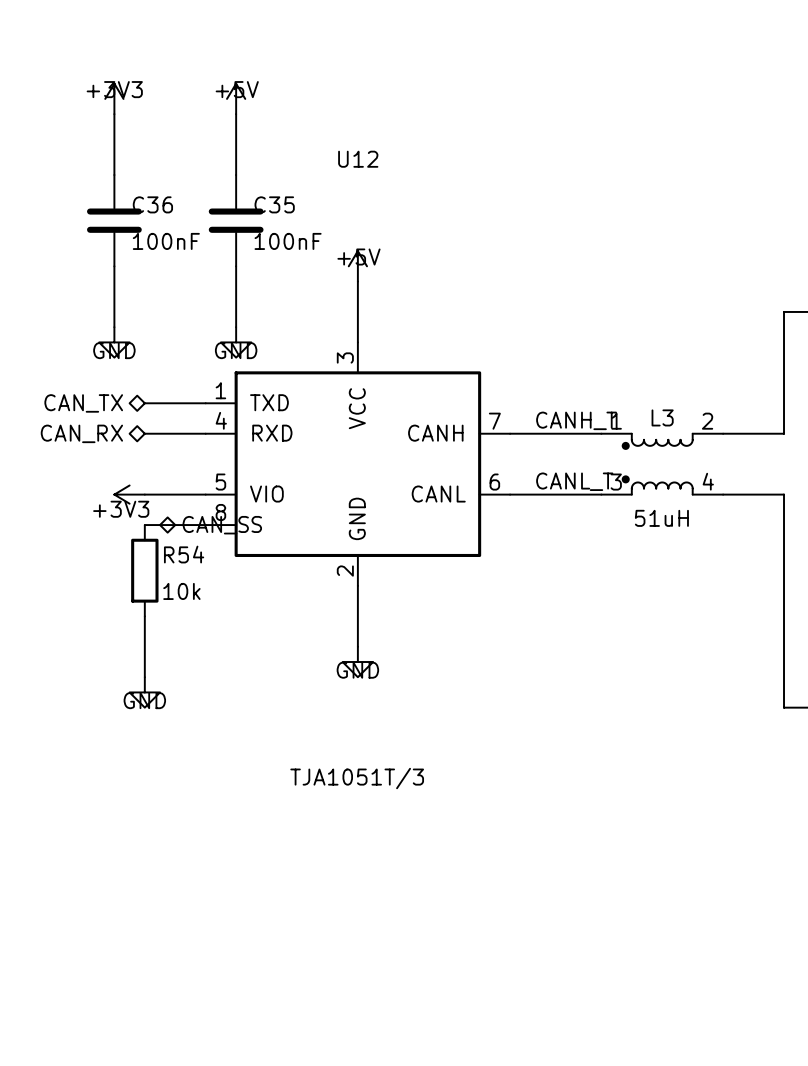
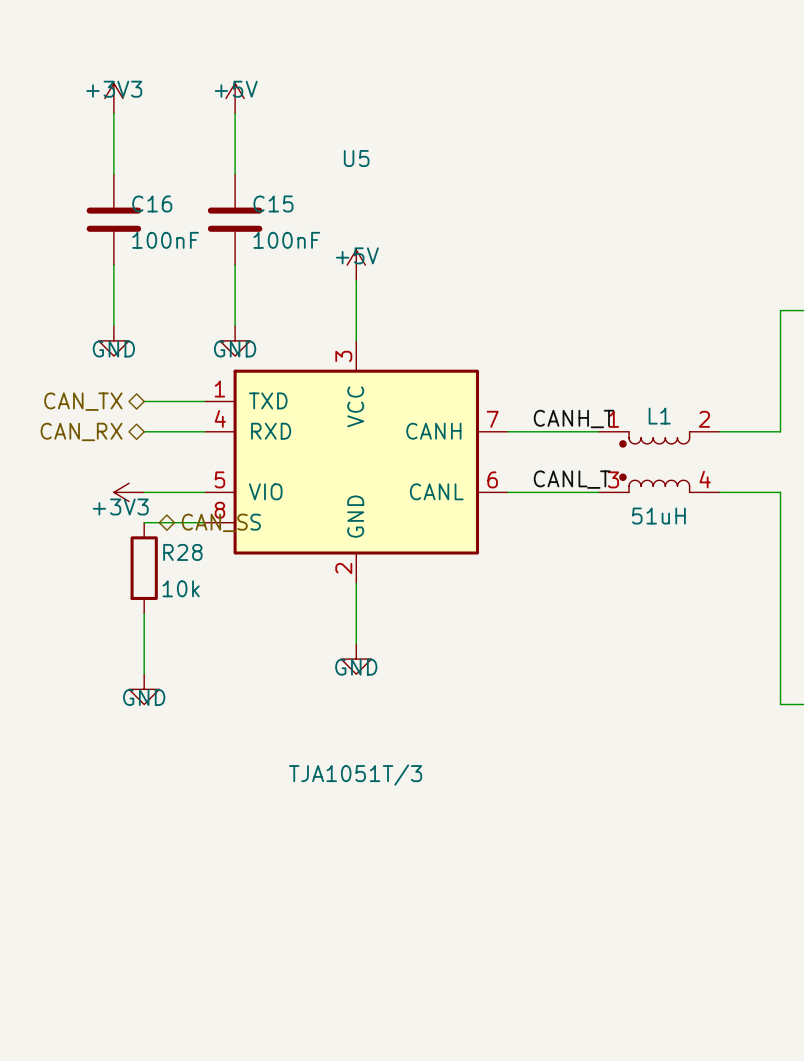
U12 name: U12 (358, 159) -> U5 (356, 158)
C36 name: C36 (152, 204) -> C16 (152, 203)
C35 name: C35 (274, 204) -> C15 (273, 203)
L3 name: L3 (662, 417) -> L1 (659, 416)
R54 name: R54 (184, 554) -> R28 (182, 552)

